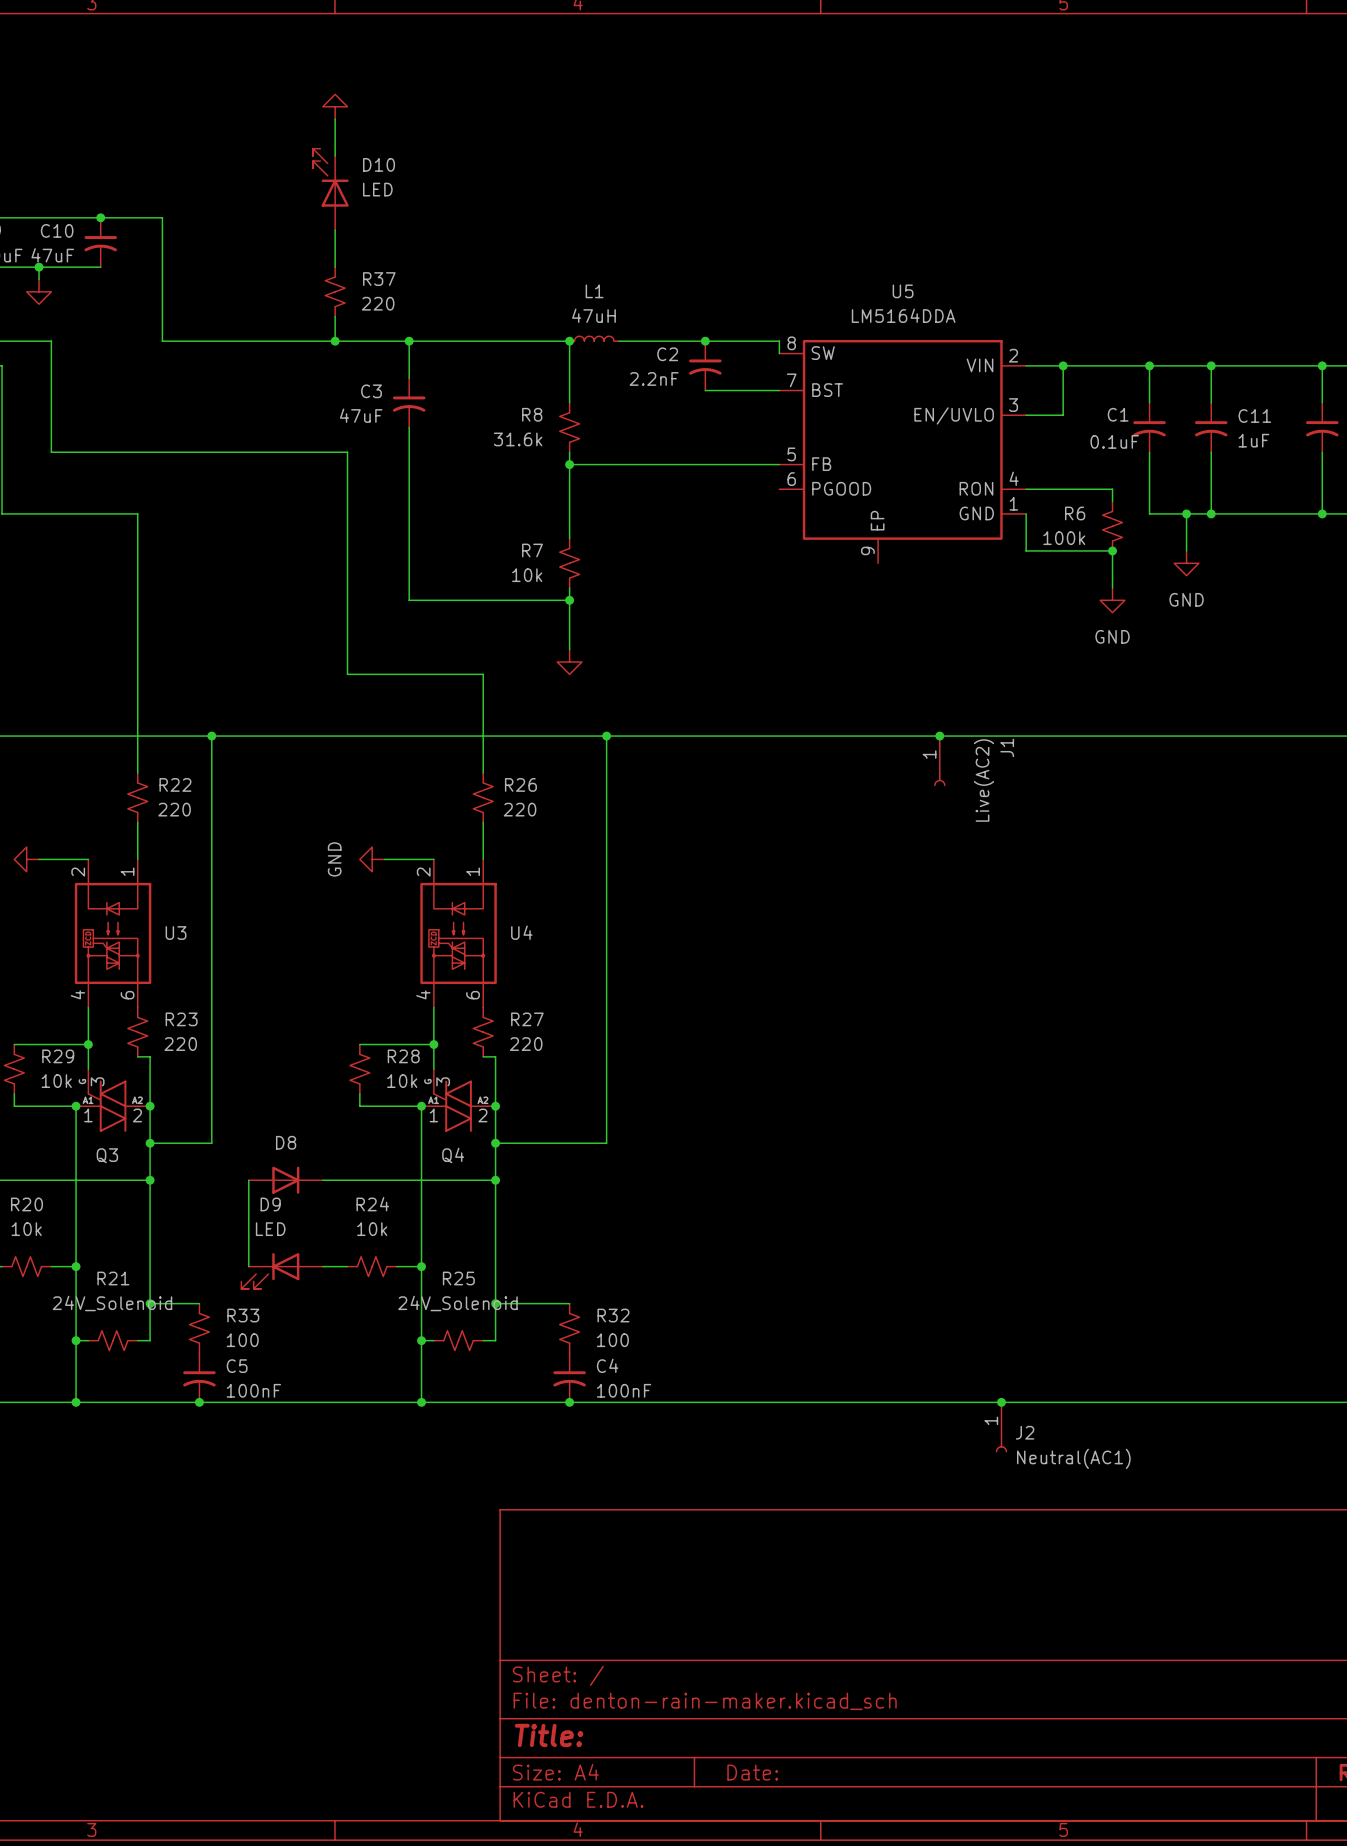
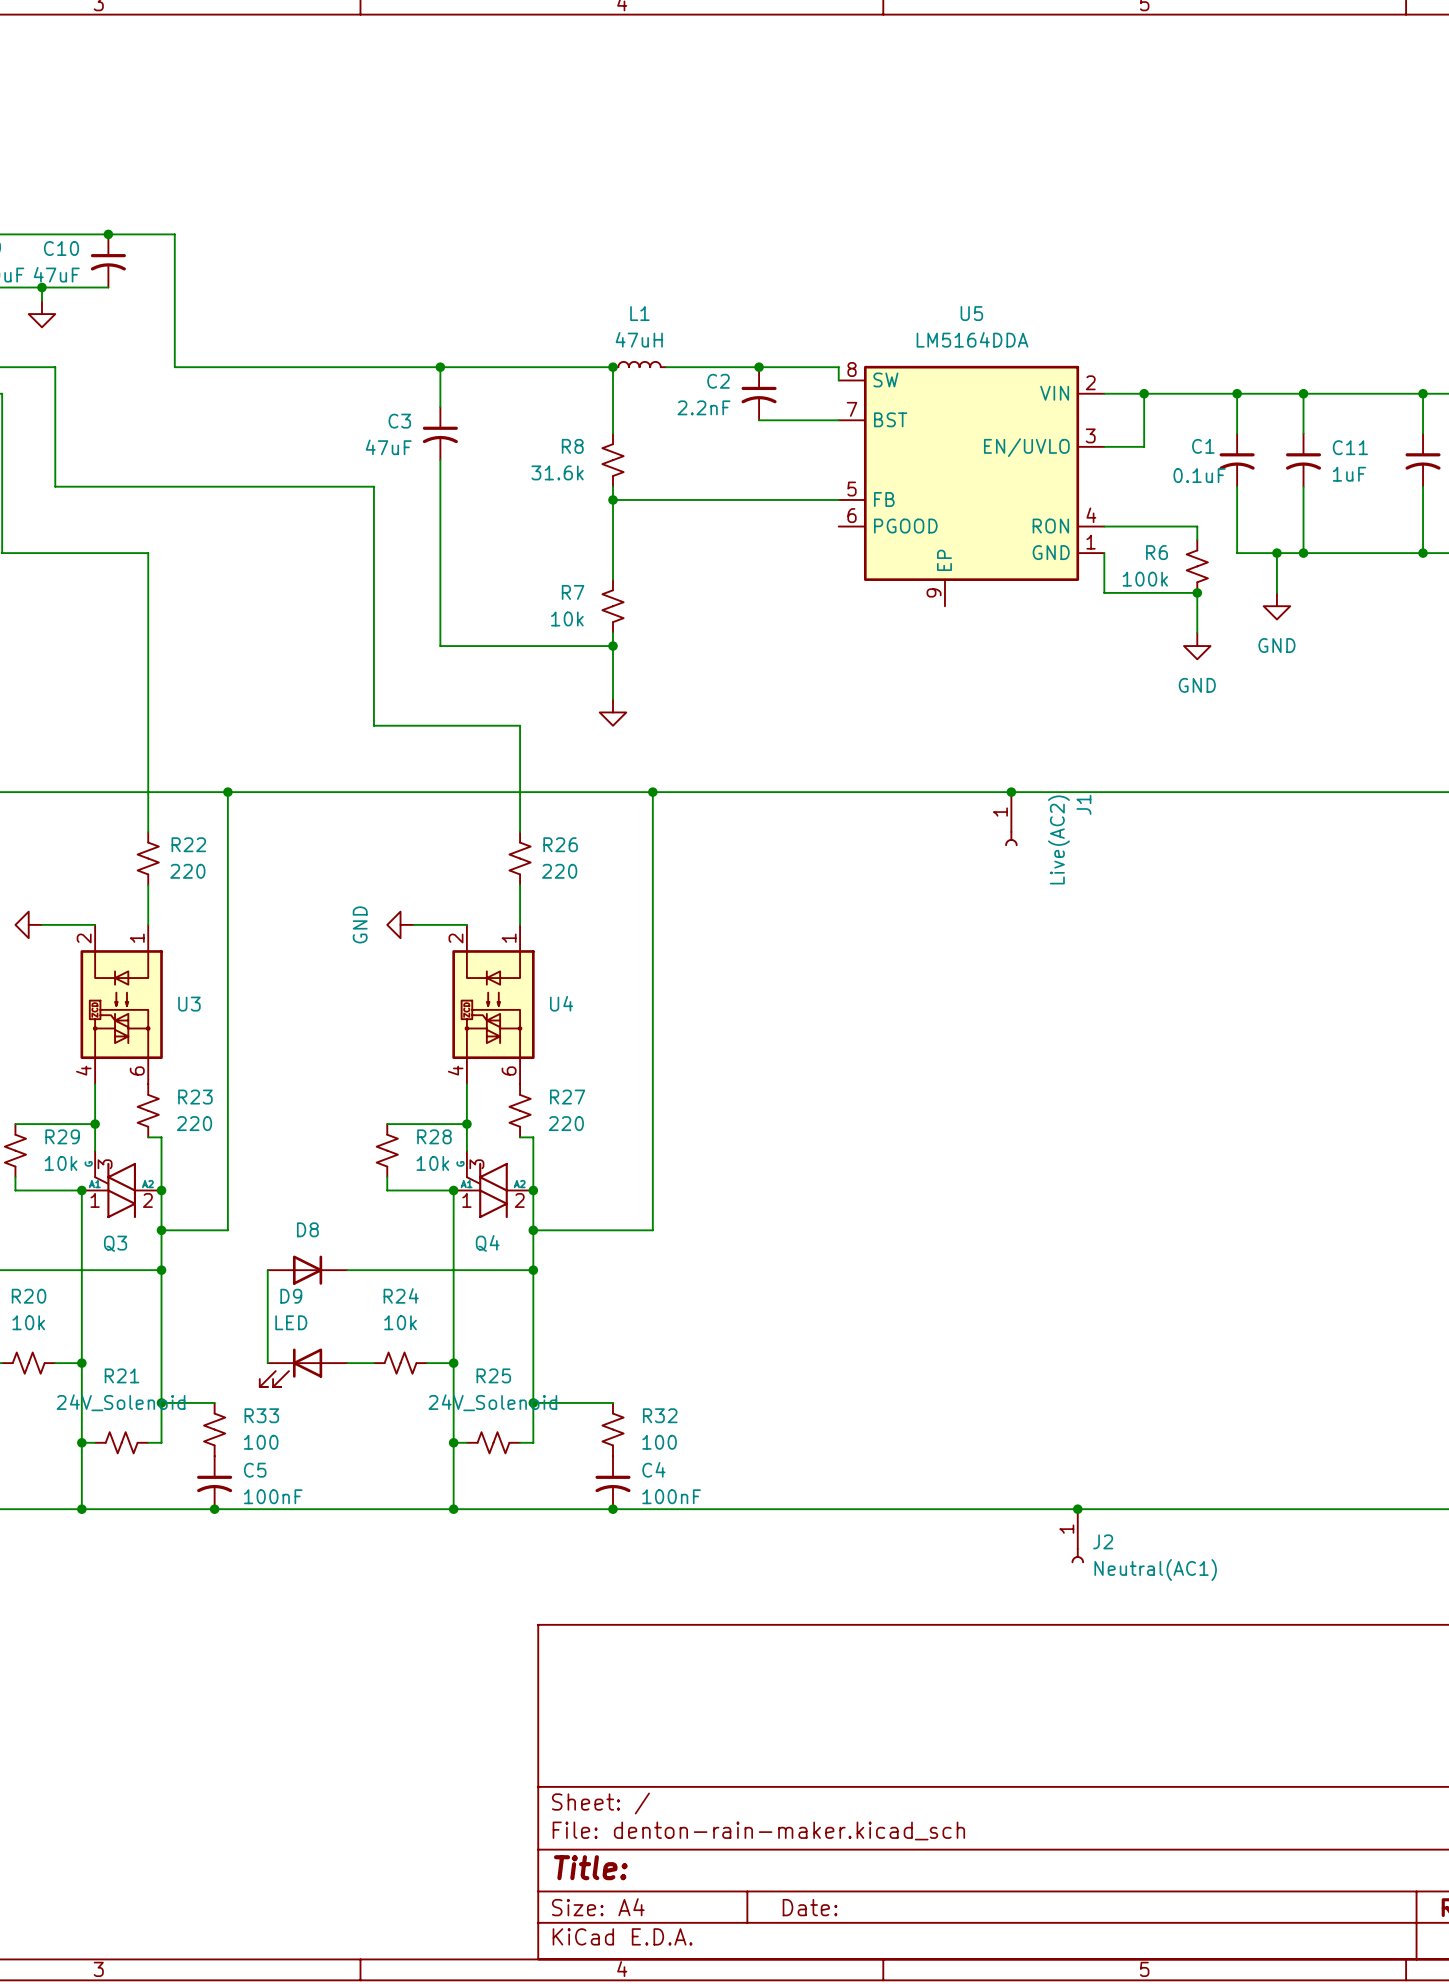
power symbol: (335, 106) -> none
wire: (335, 119) (335, 156) -> none
D10: LED (330, 189) -> none
wire: (335, 230) (335, 267) -> none
R37: 220 (335, 291) -> none
wire: (335, 316) (335, 341) -> none
junction: (335, 341) -> none

